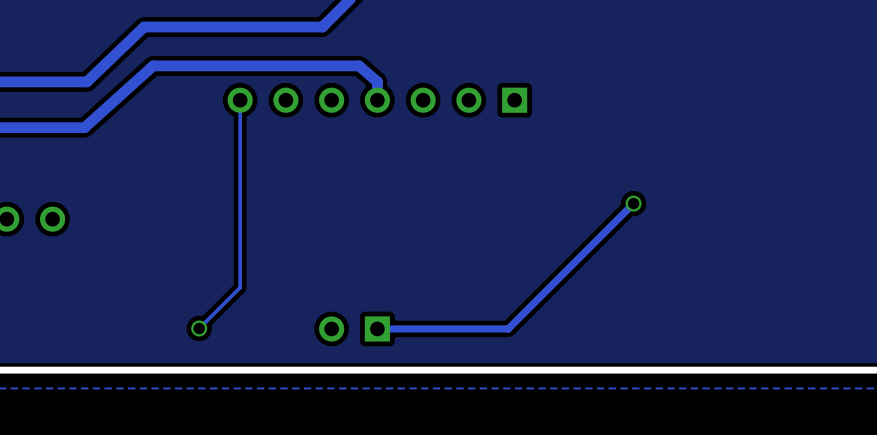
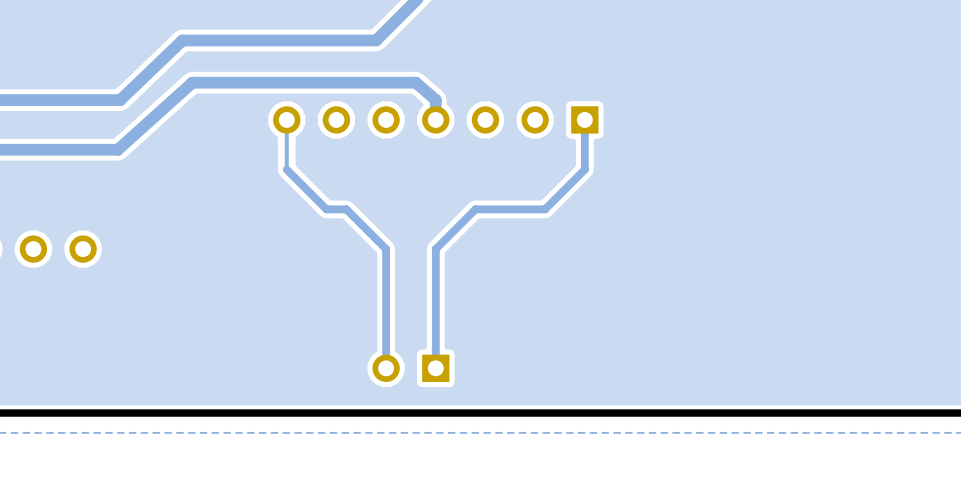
track: (240, 145) (240, 287) (199, 328) -> (286, 169) (326, 209) (346, 209) (386, 249) (386, 368)
track: (633, 203) (508, 328) (377, 328) -> (584, 119) (584, 169) (545, 209) (475, 209) (435, 249) (435, 368)
via: (633, 203) -> none
via: (199, 328) -> none

